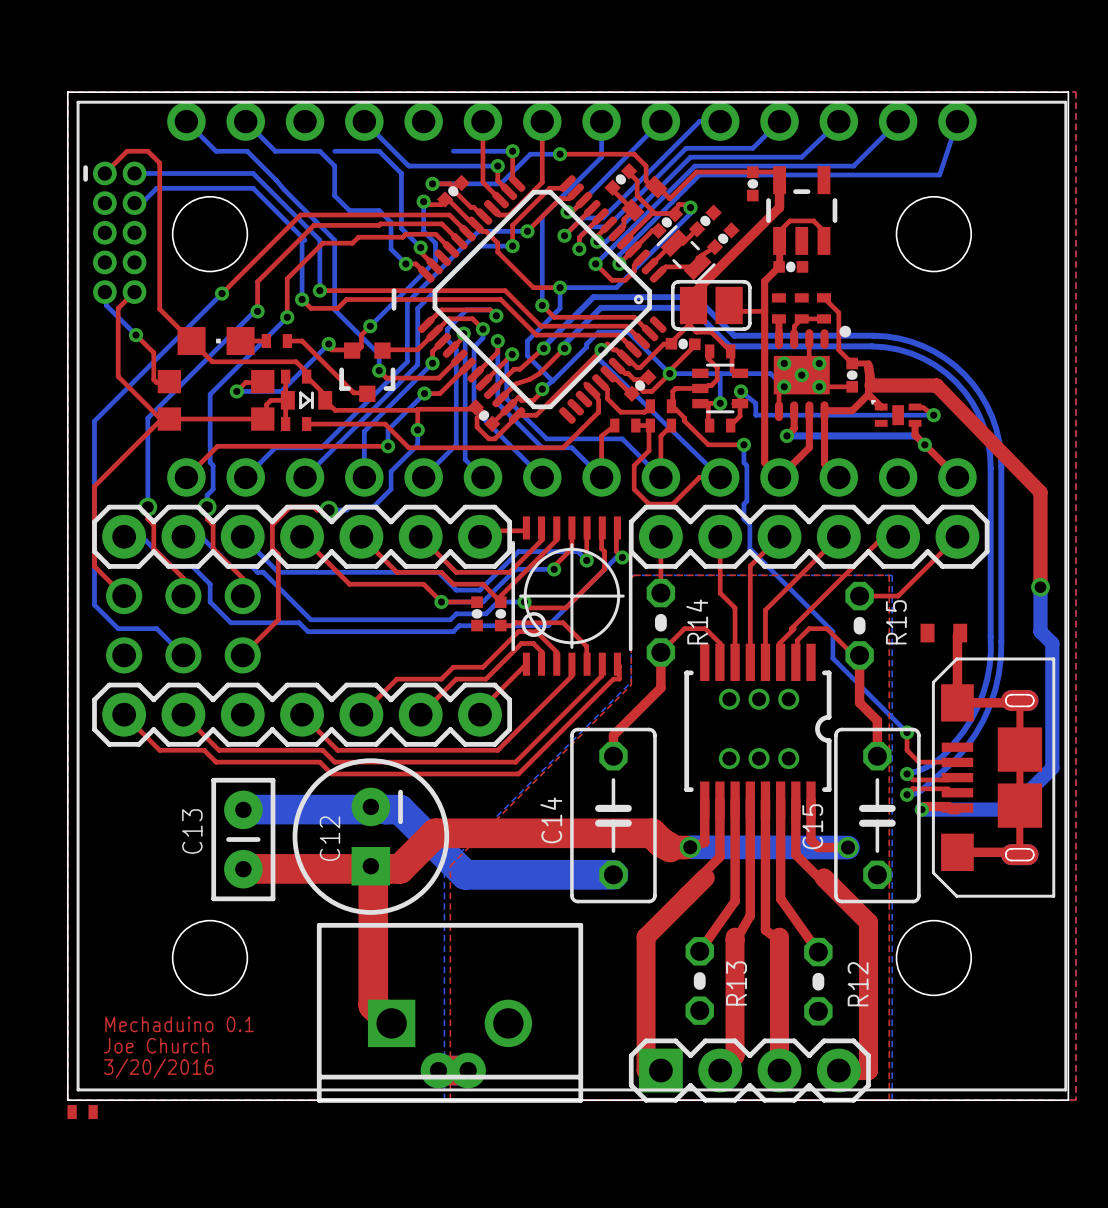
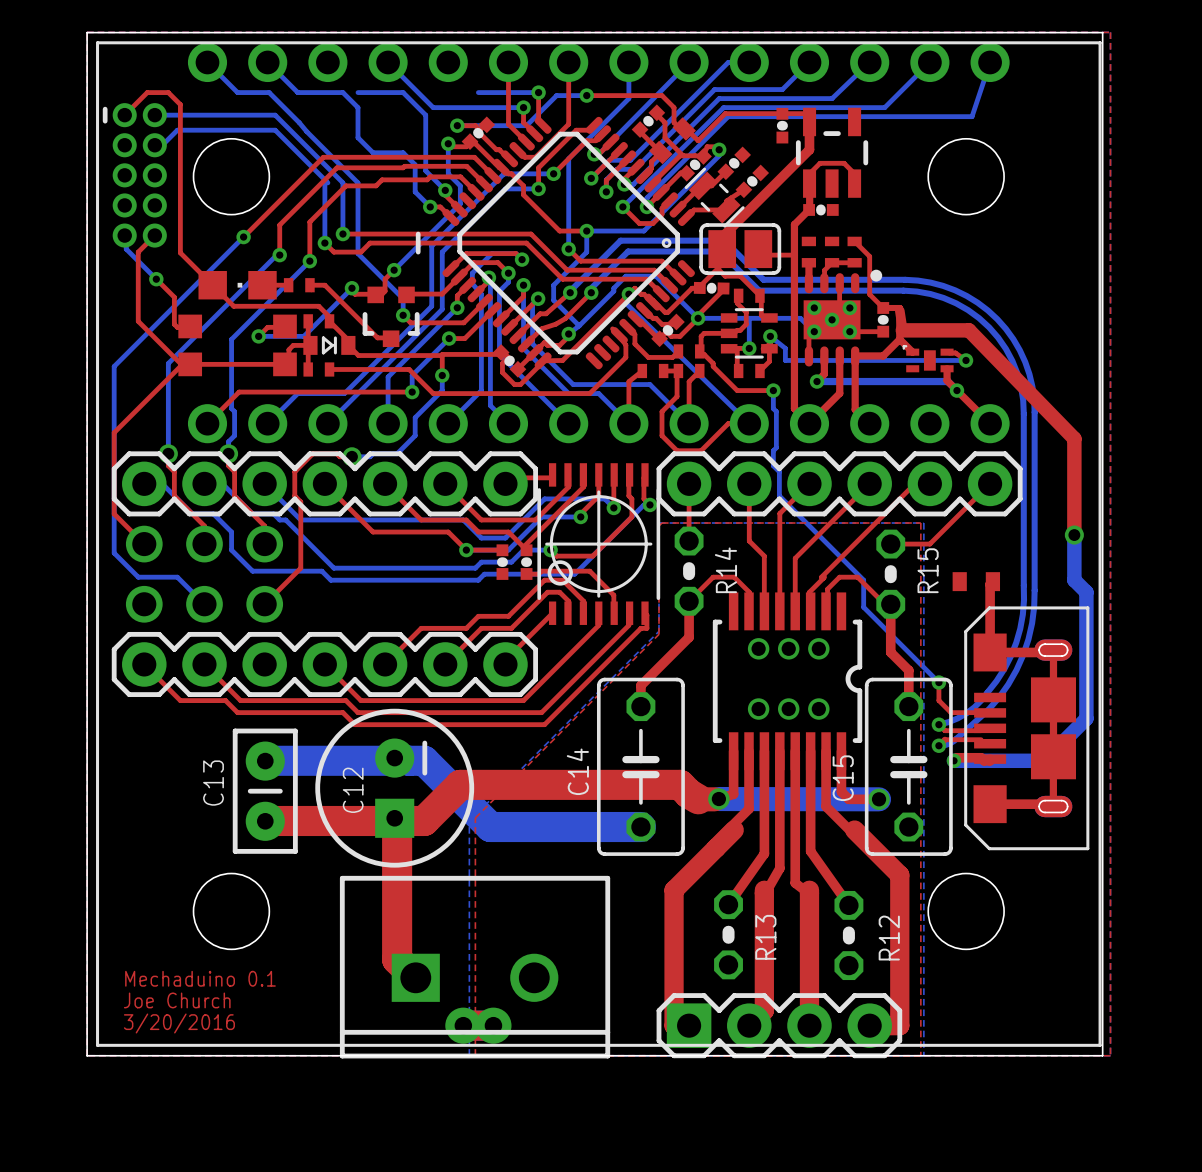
part: (82, 1112) -> none

